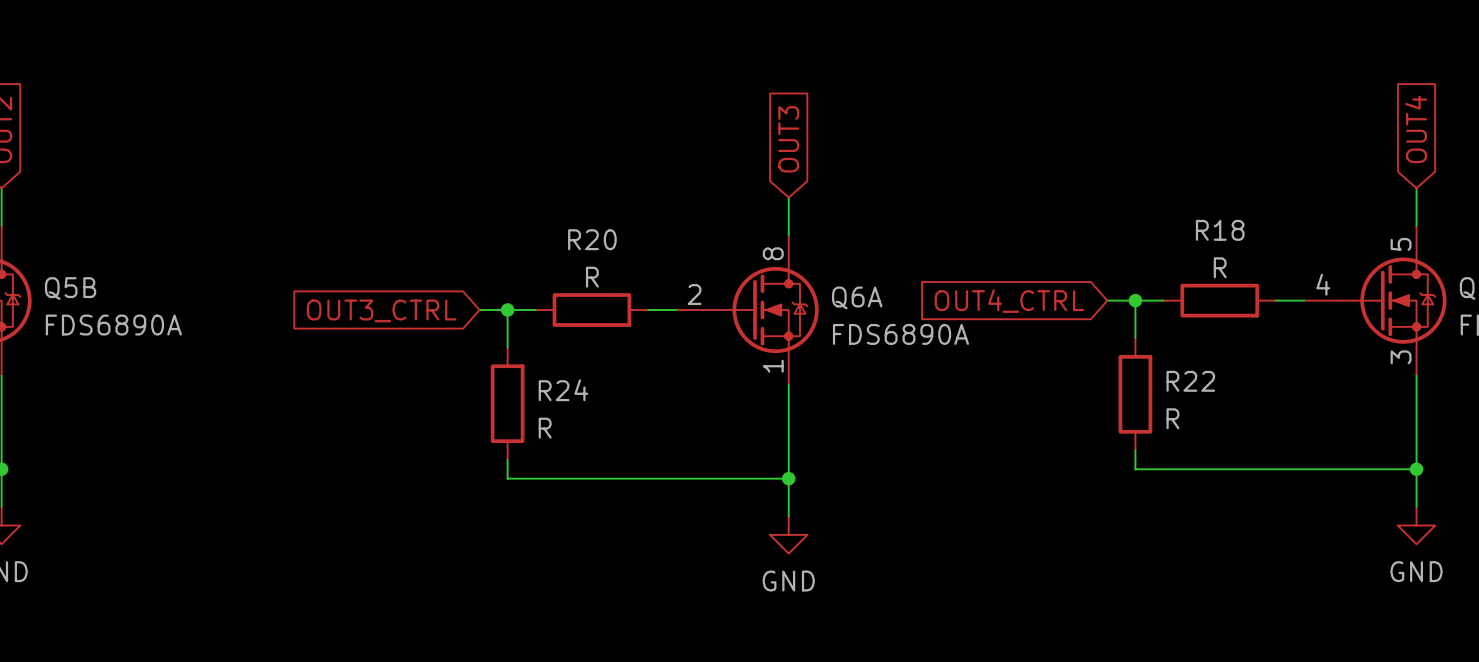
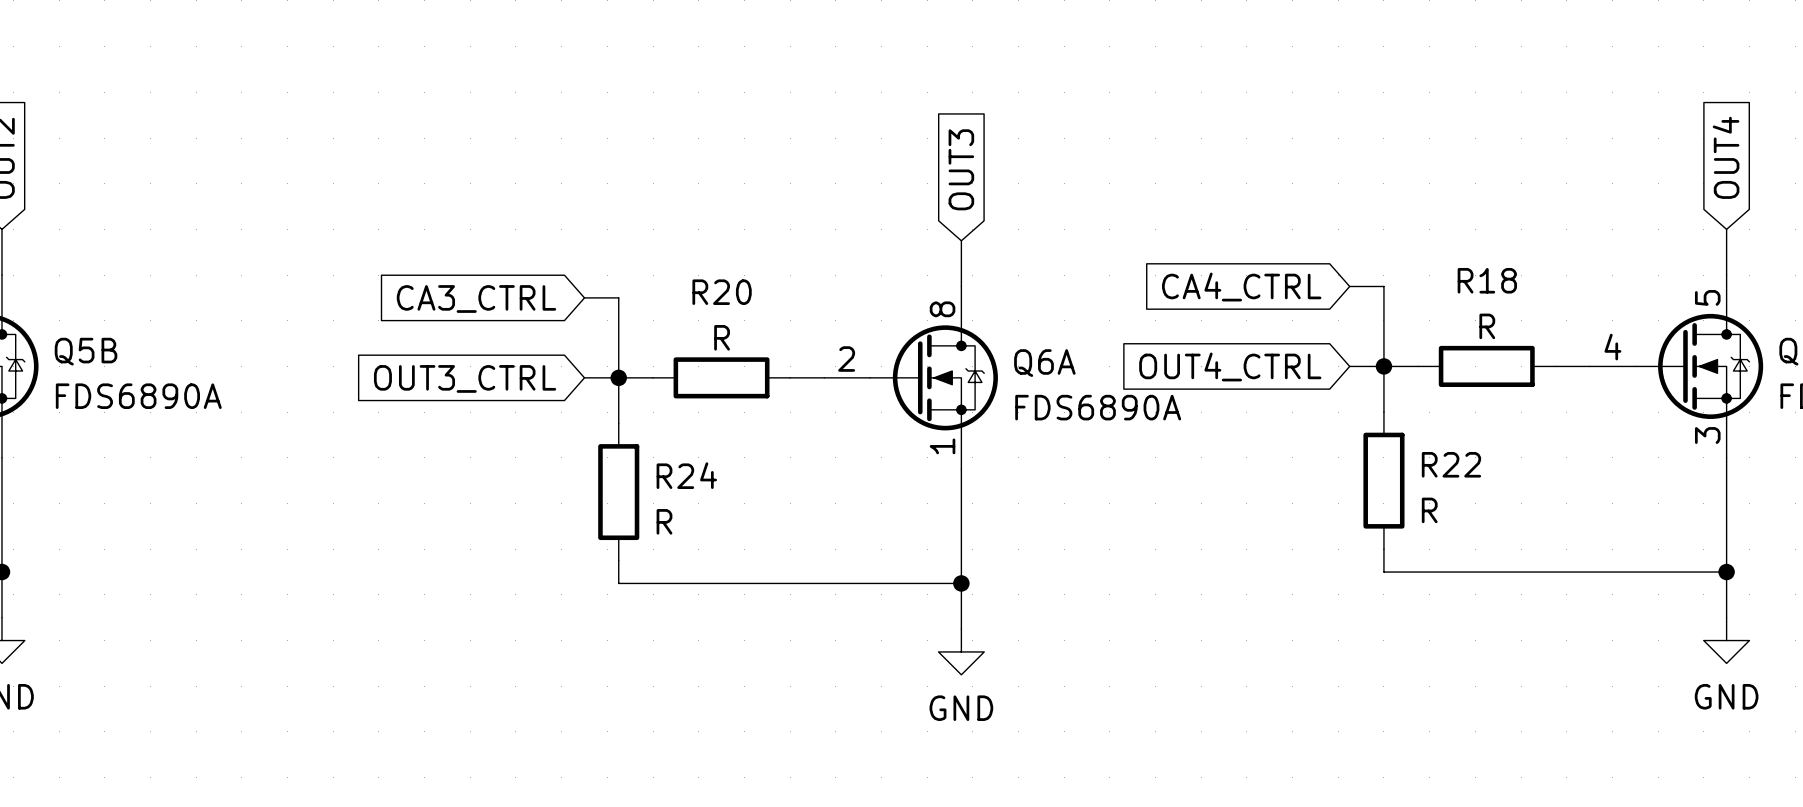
global label: none -> CA4_CTRL (1241, 287)
wire: none -> (1349, 286) (1383, 286) (1383, 366)
wire: none -> (584, 297) (618, 297) (618, 377)
global label: none -> CA3_CTRL (476, 299)

